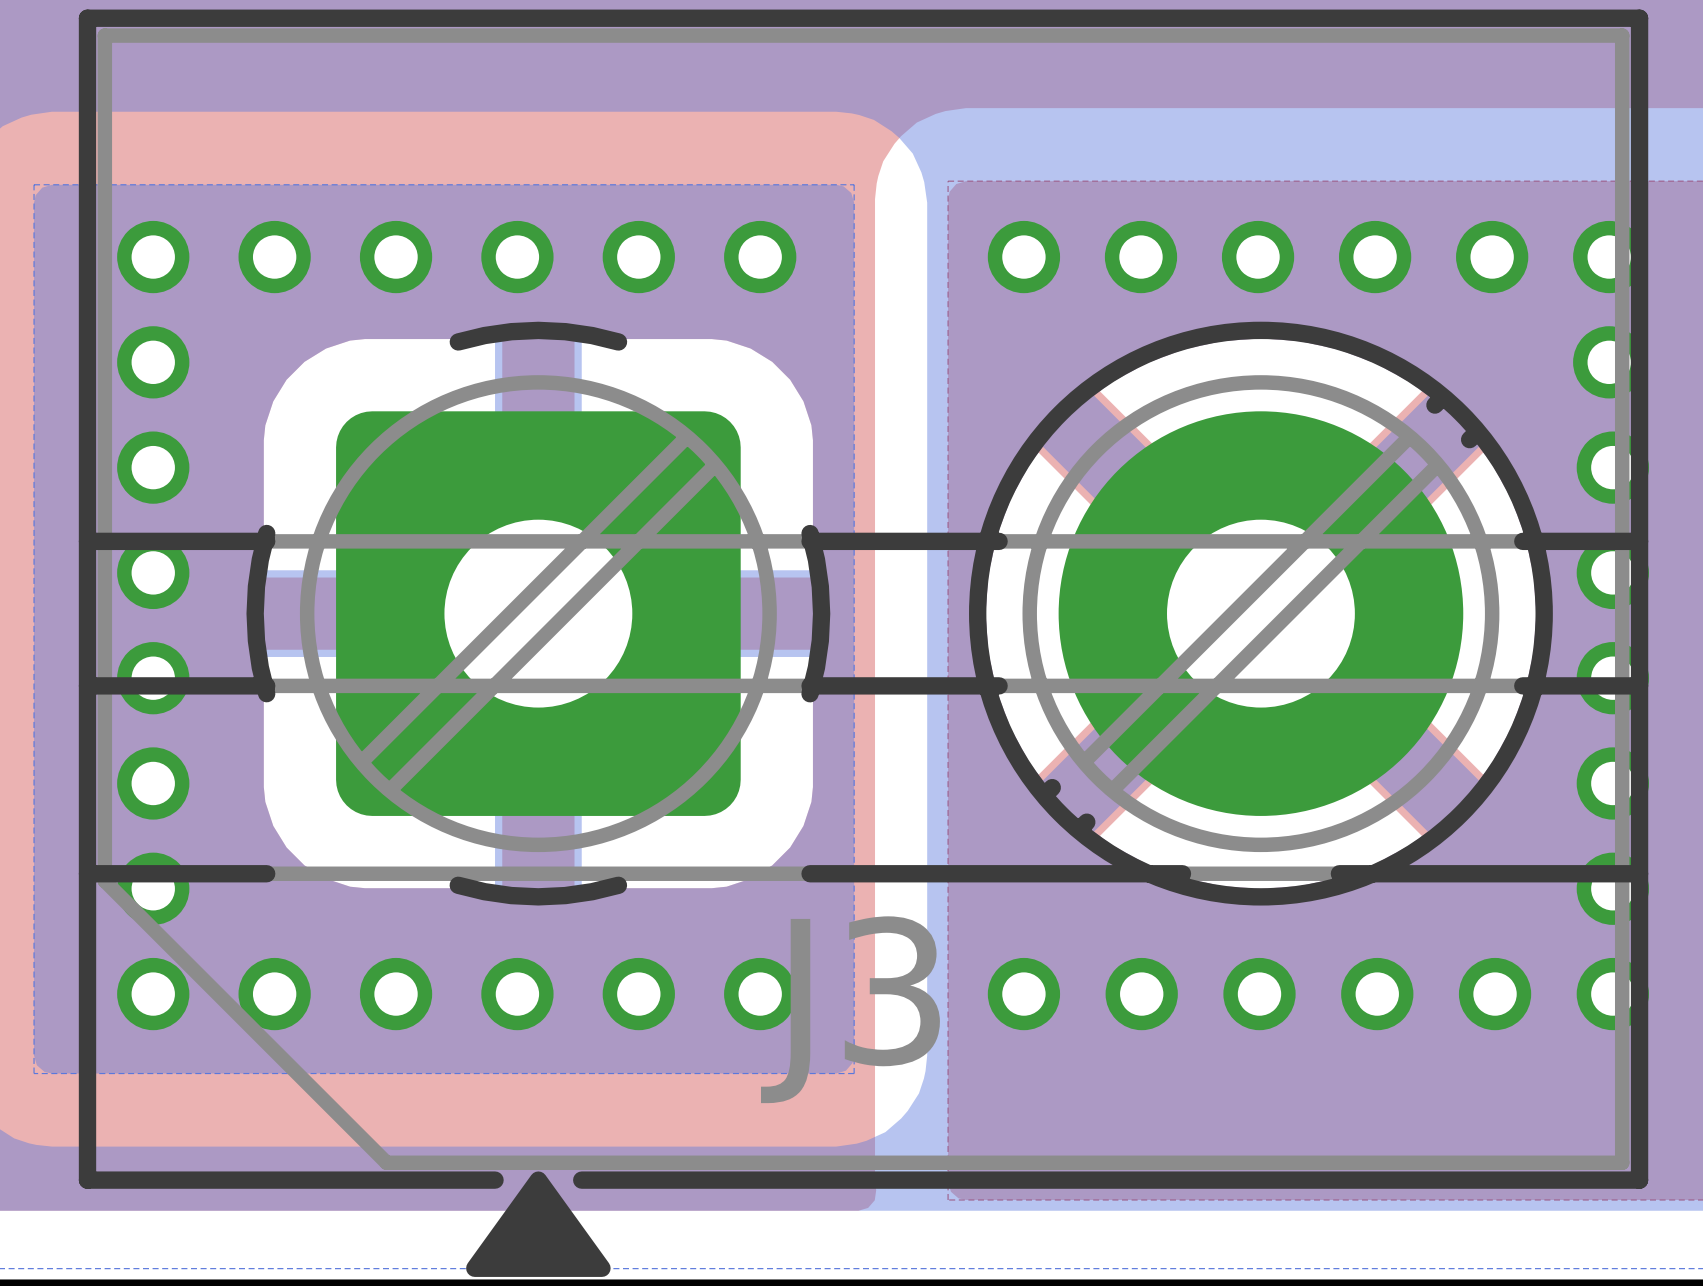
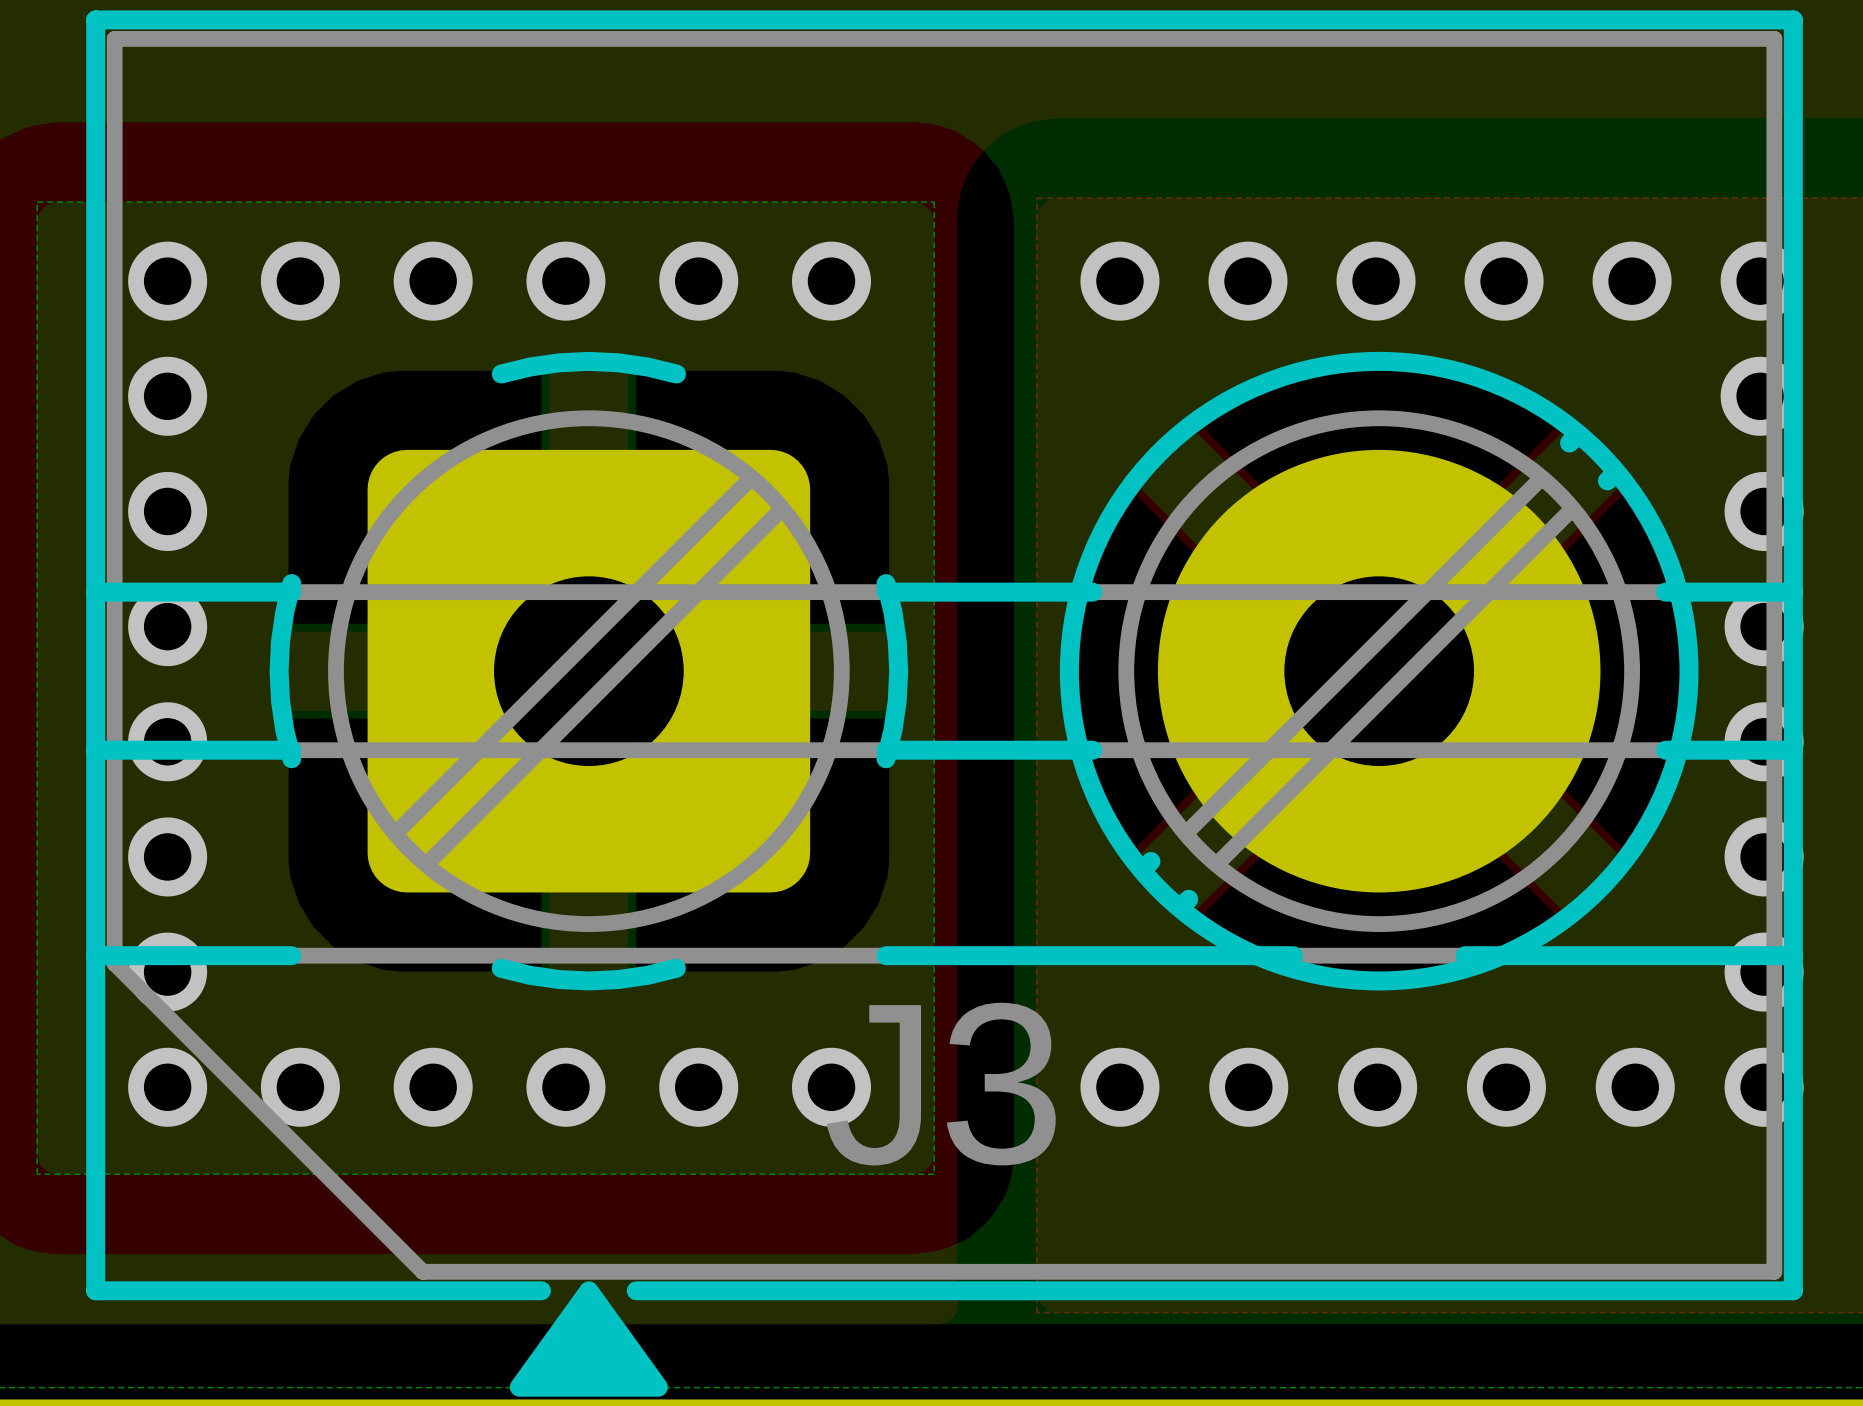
J3 footprint: [78, 9, 1649, 1277] -> [86, 10, 1803, 1397]

